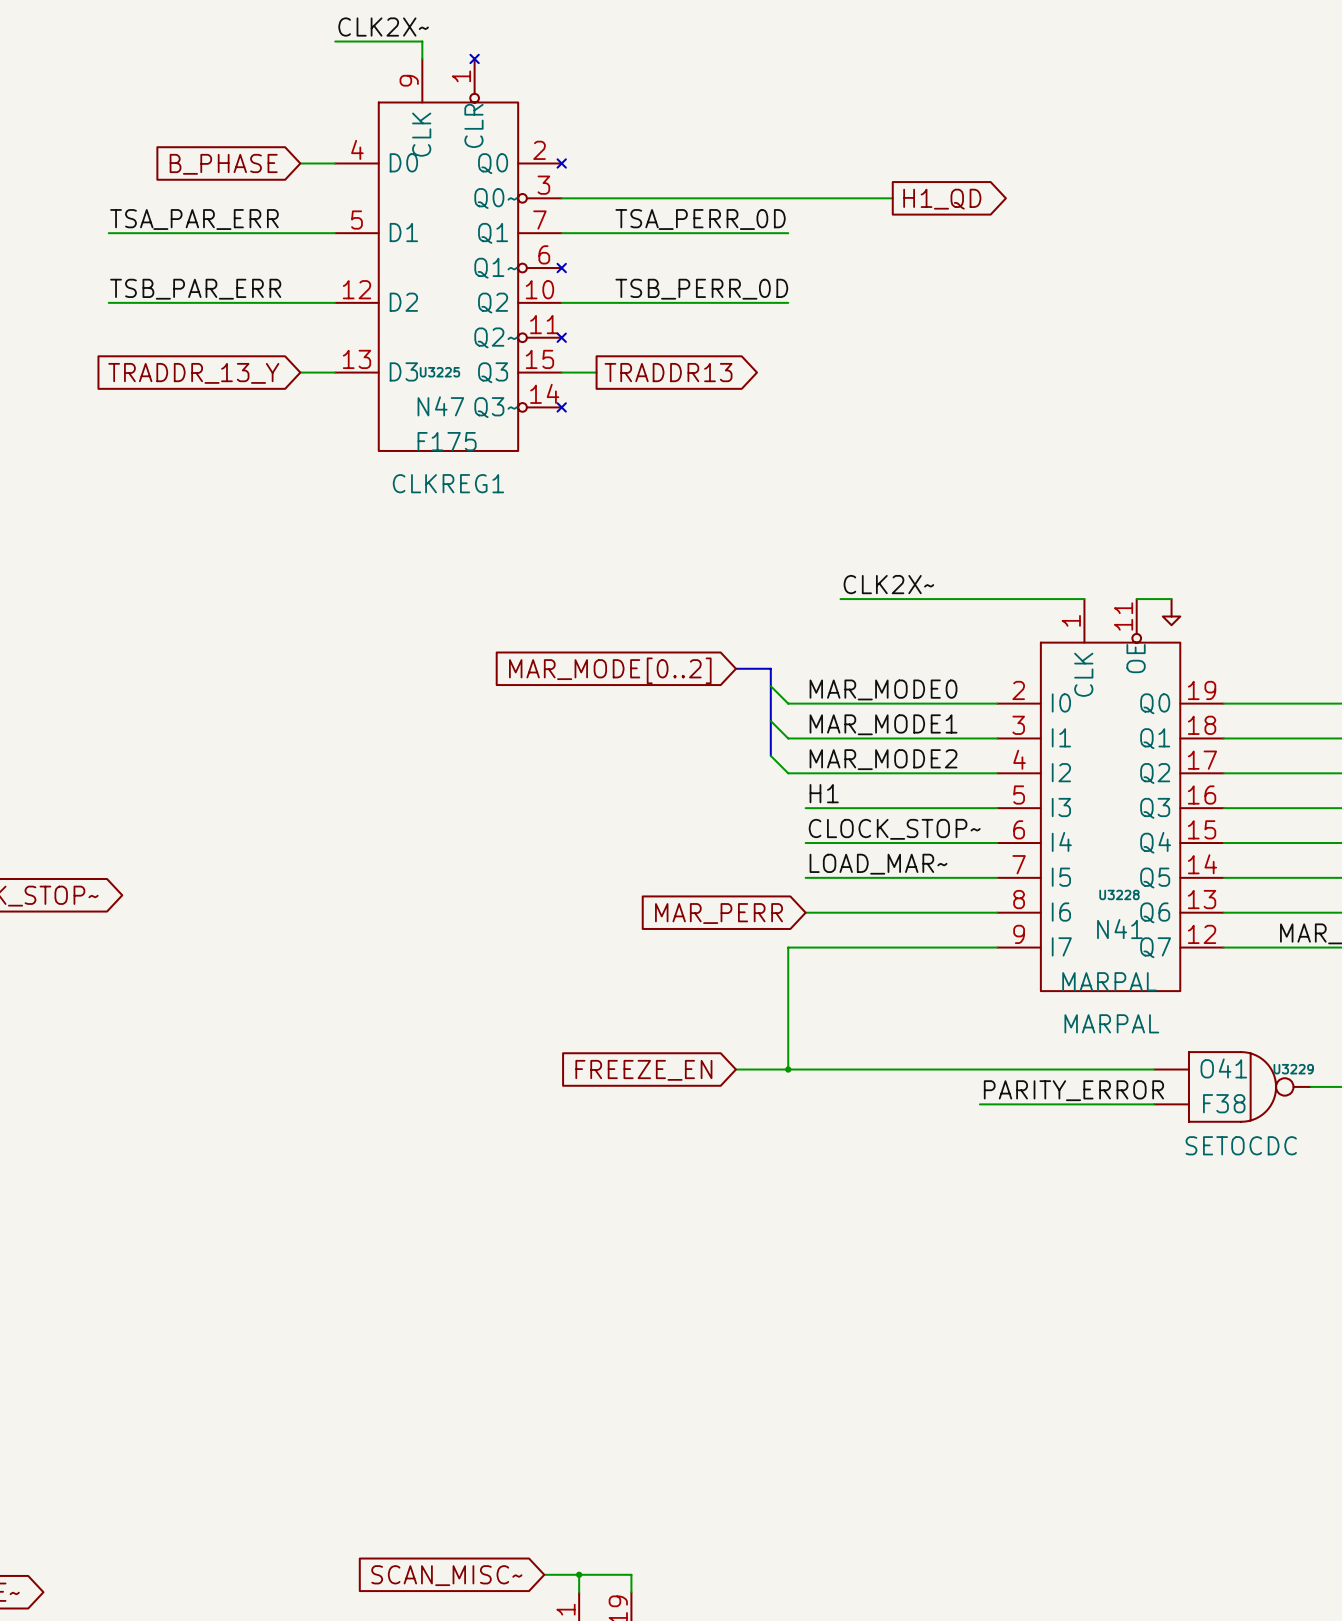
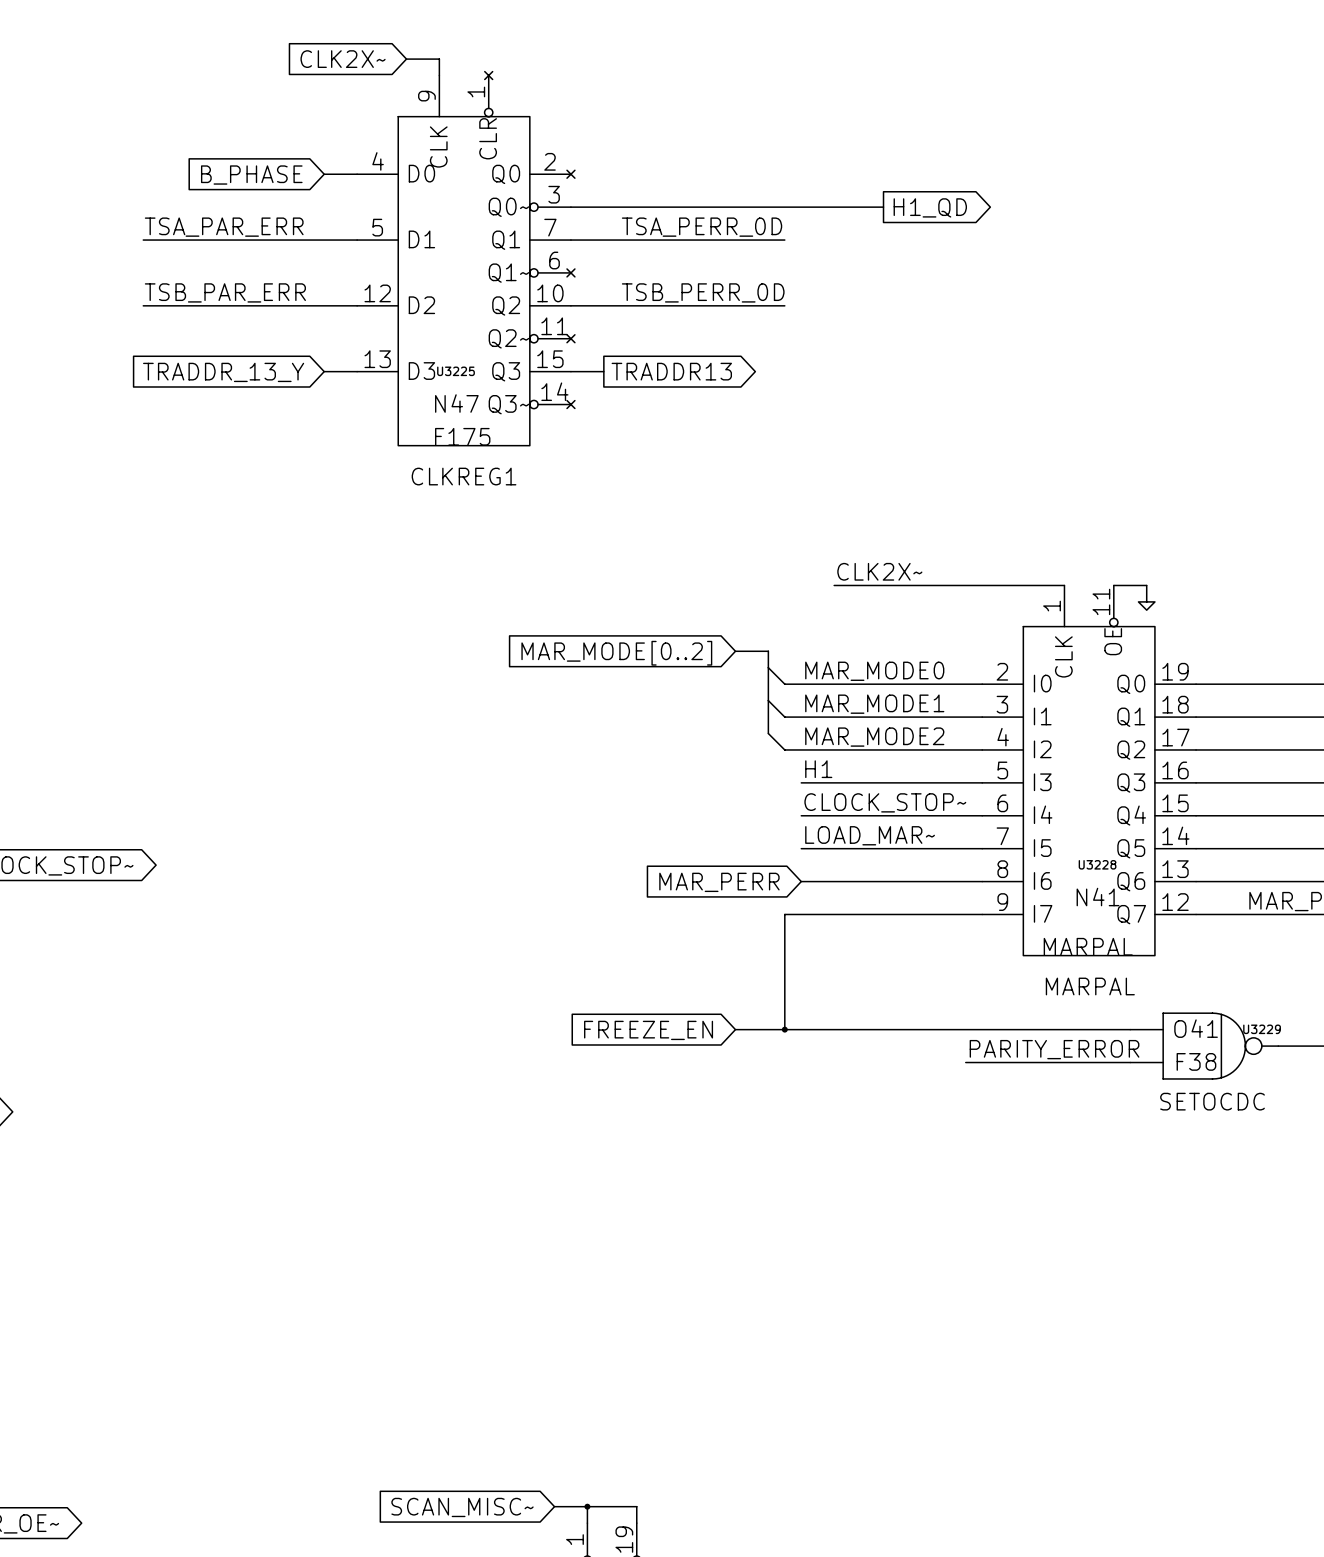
label: CLK2X~ (383, 27) -> none
global label: none -> CLK2X~ (343, 59)
wire: (335, 41) (387, 41) -> none

